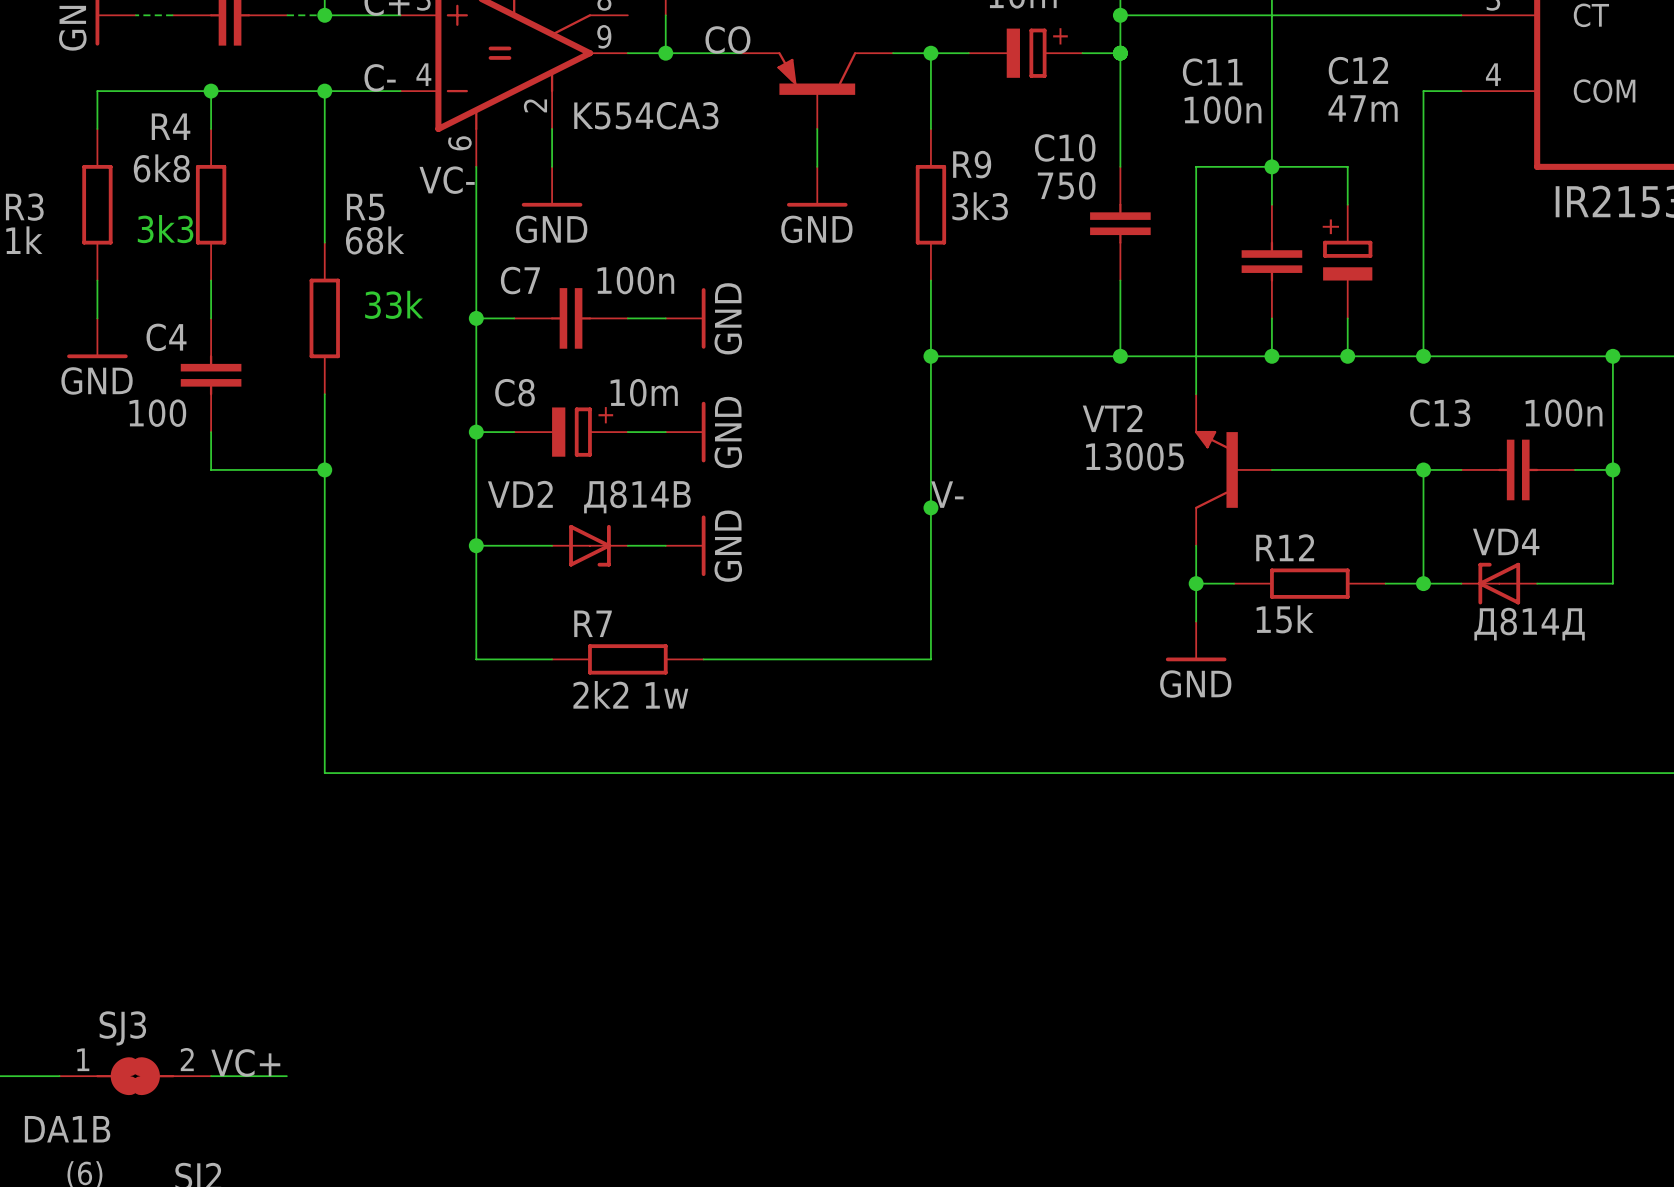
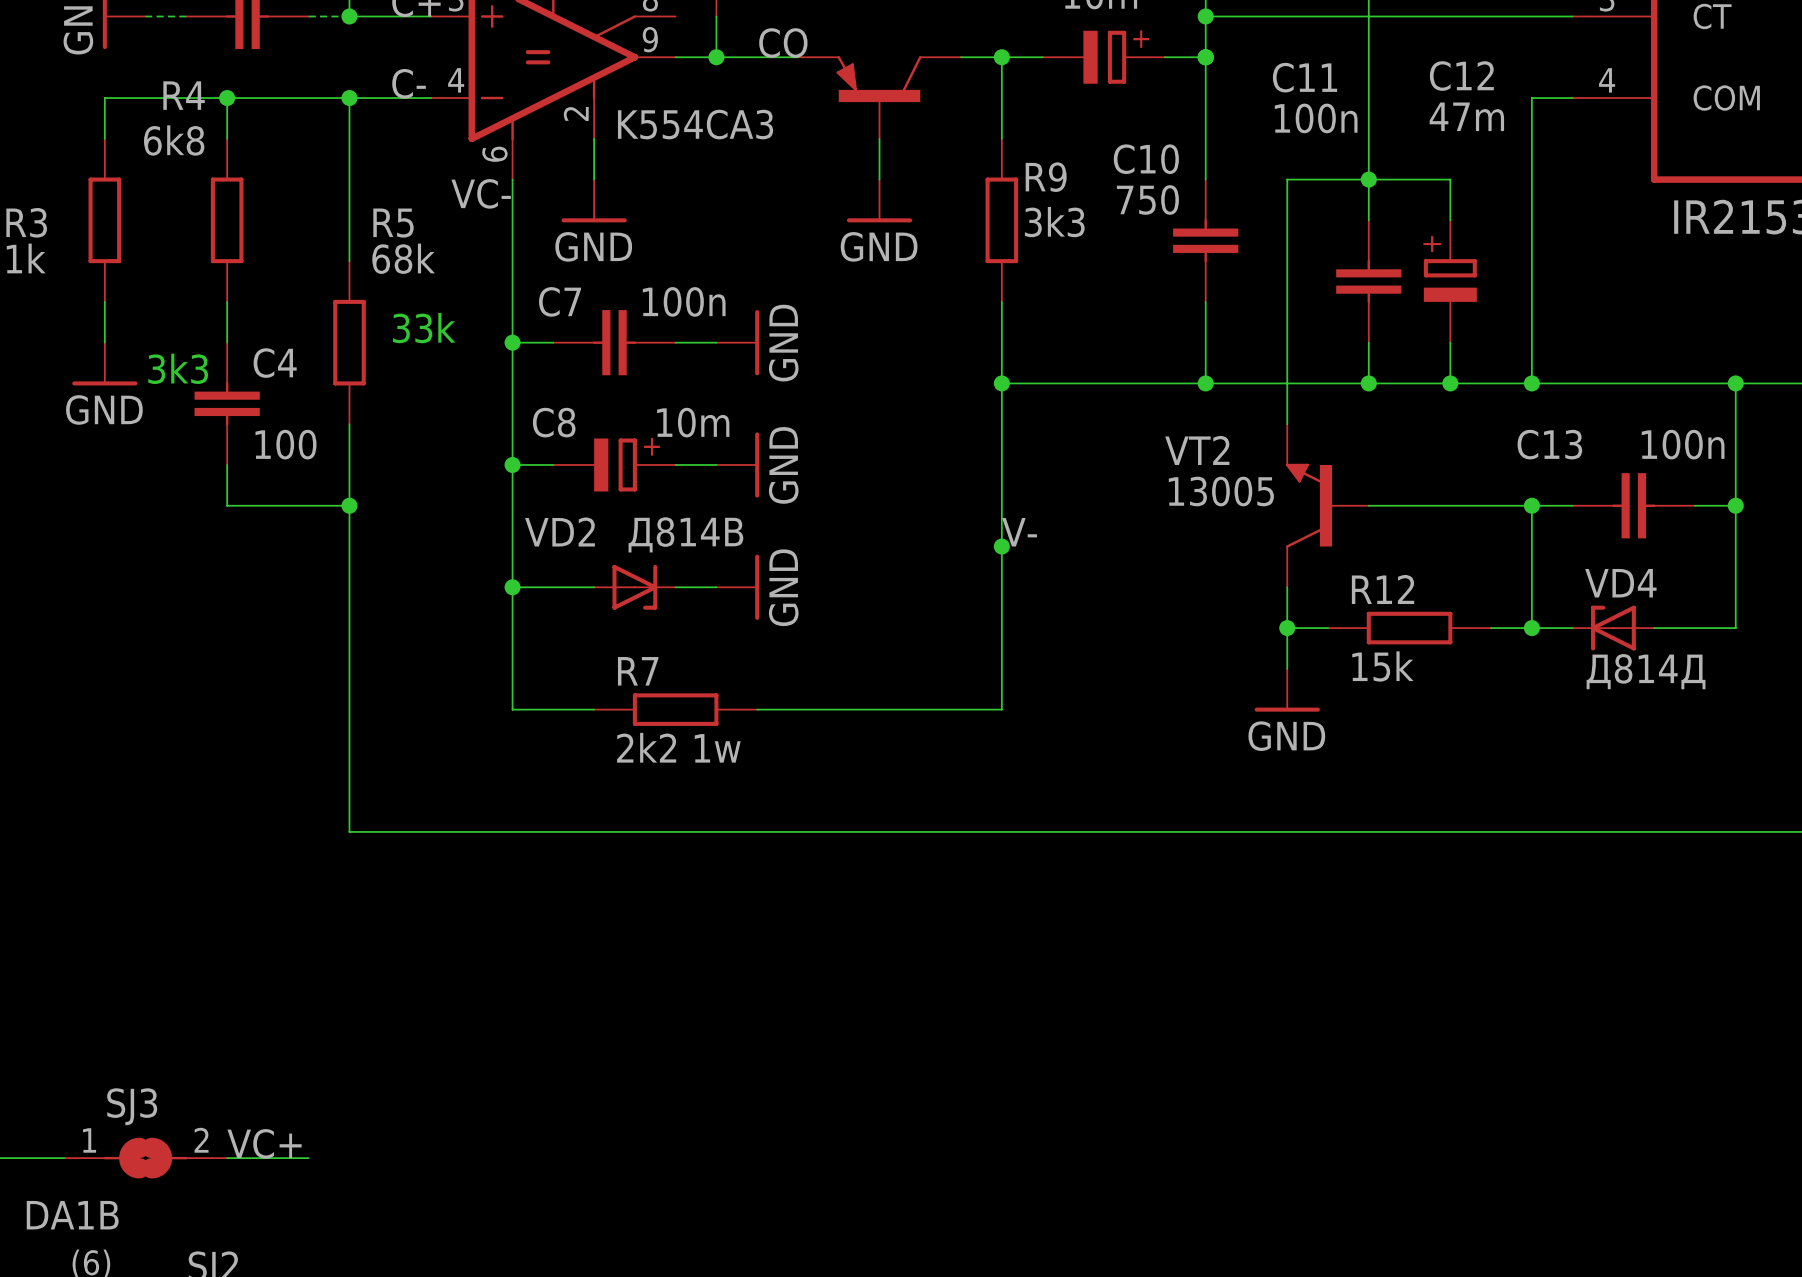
R4 name position: R4 (171, 126) -> R4 (184, 95)
R4 value position: 6k8 (161, 168) -> 6k8 (174, 140)
text position: 3k3 (165, 229) -> 3k3 (178, 368)
C4 name position: C4 (166, 337) -> C4 (275, 363)
C4 value position: 100 (157, 413) -> 100 (286, 444)

